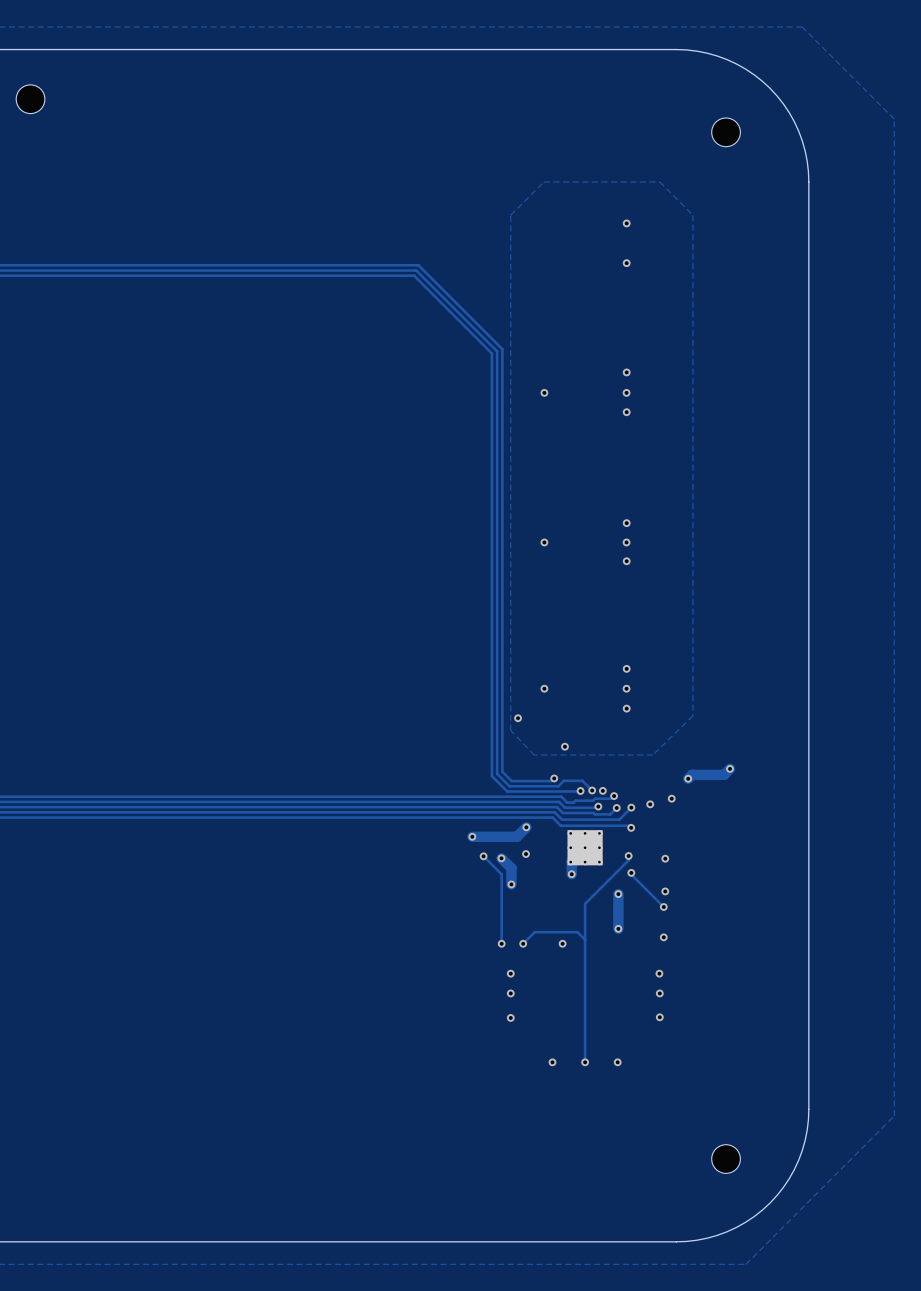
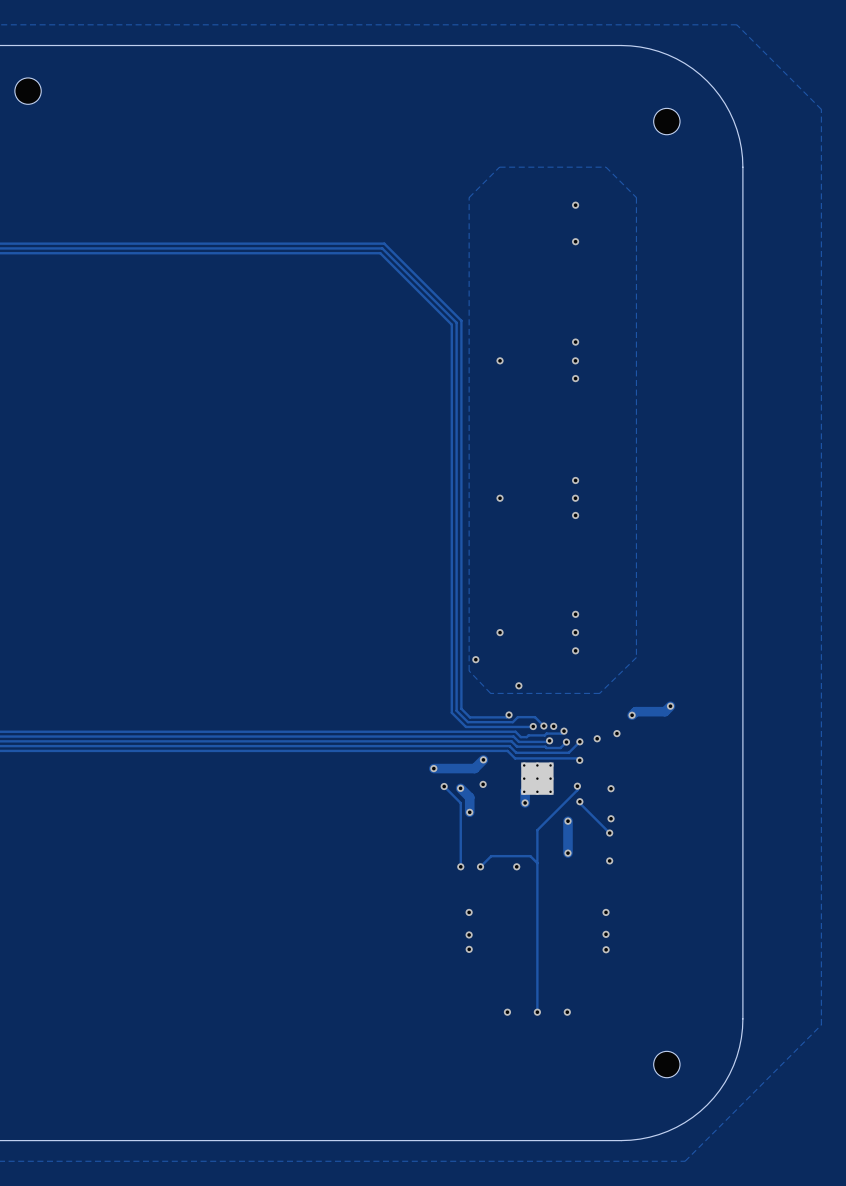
via: (510, 973) -> none
via: (659, 973) -> none
via: none -> (469, 949)
via: none -> (606, 949)
via: (552, 1062) -> none
track: none -> (537, 975) (537, 1012)
via: (585, 1062) -> none
via: (617, 1062) -> none
via: none -> (507, 1012)
via: none -> (537, 1012)
via: none -> (567, 1012)

